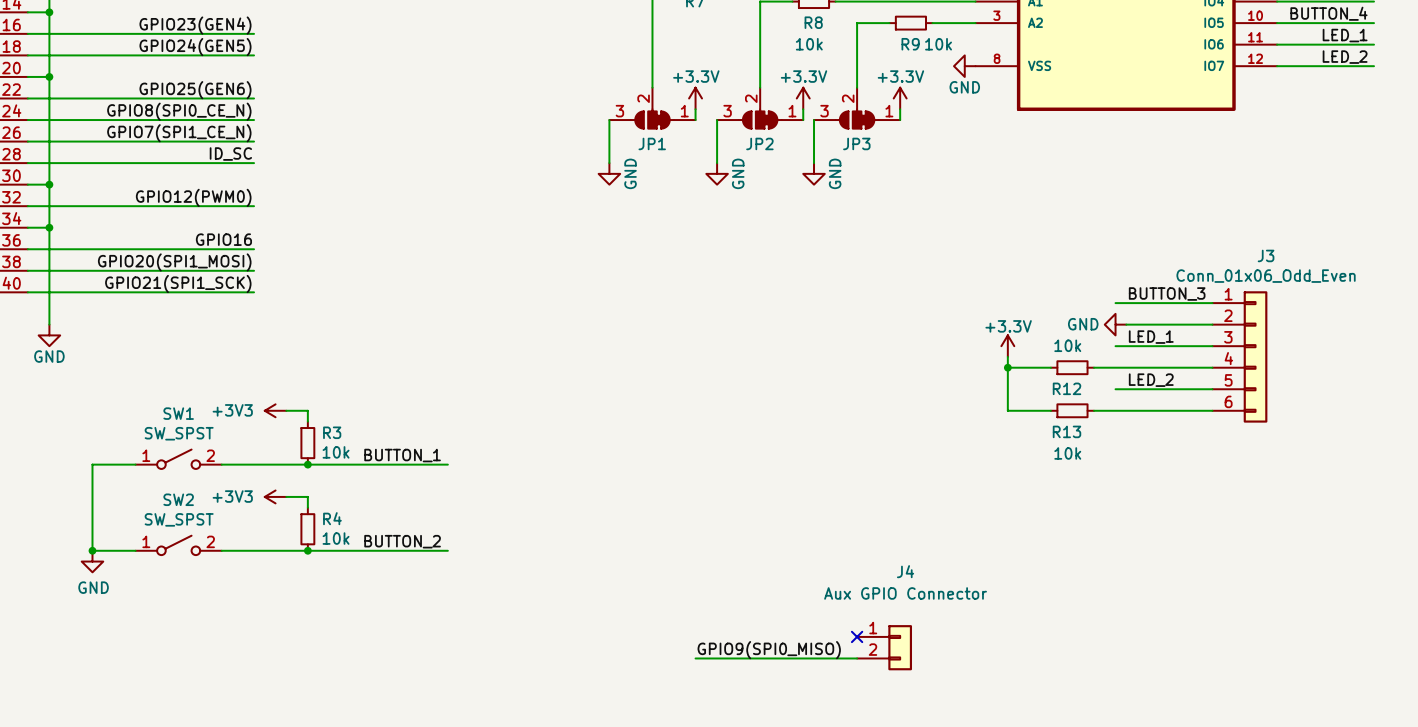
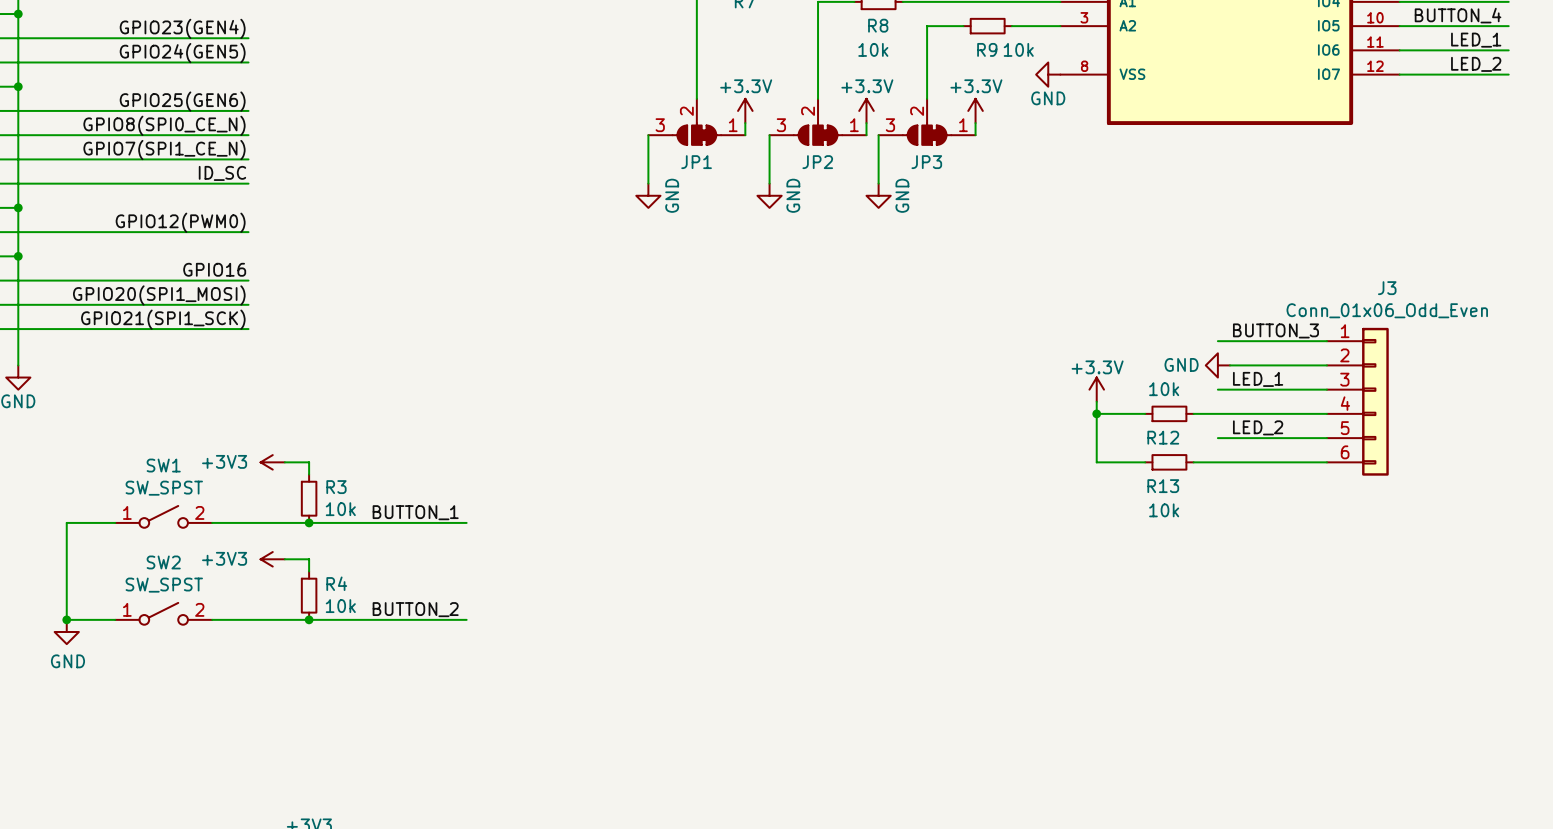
no-connect mark: (857, 636) -> none
J4: Aux GPIO Connector (884, 647) -> none
label: GPIO9(SPI0_MISO) (769, 650) -> none
wire: (695, 658) (857, 658) -> none

